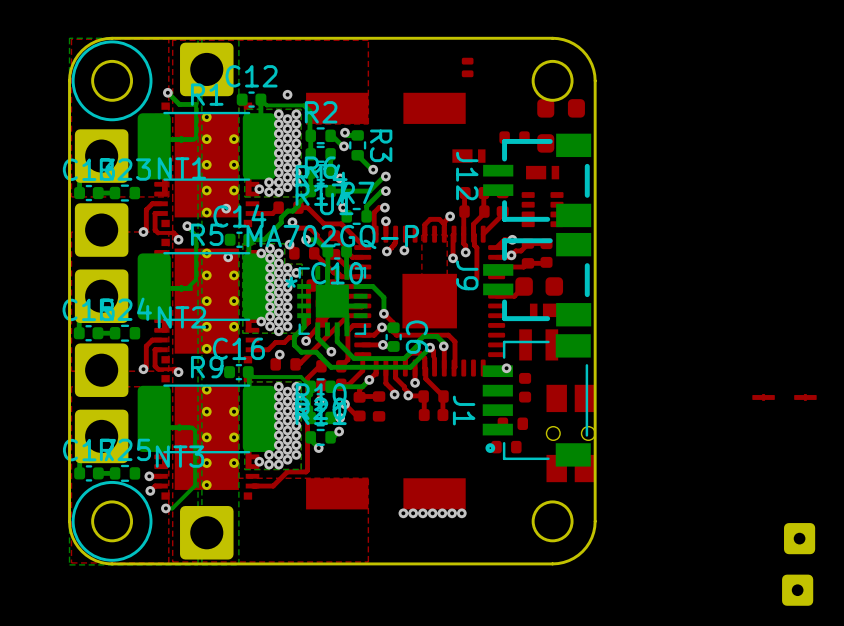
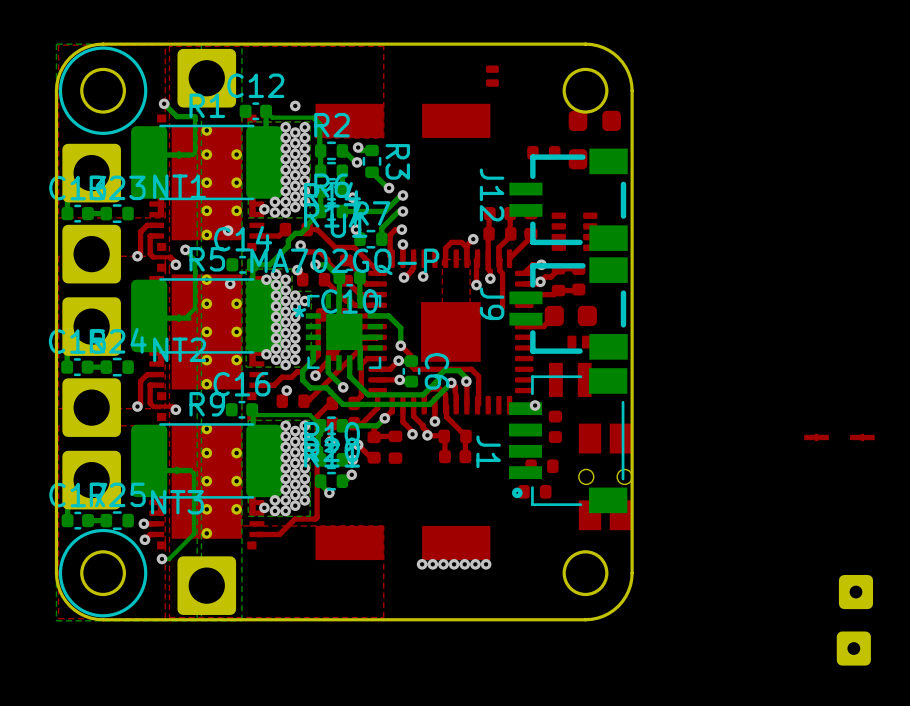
part: (468, 156) -> none
part: (542, 172) -> none
part footprint: [529, 303, 564, 318] -> [567, 335, 591, 349]

